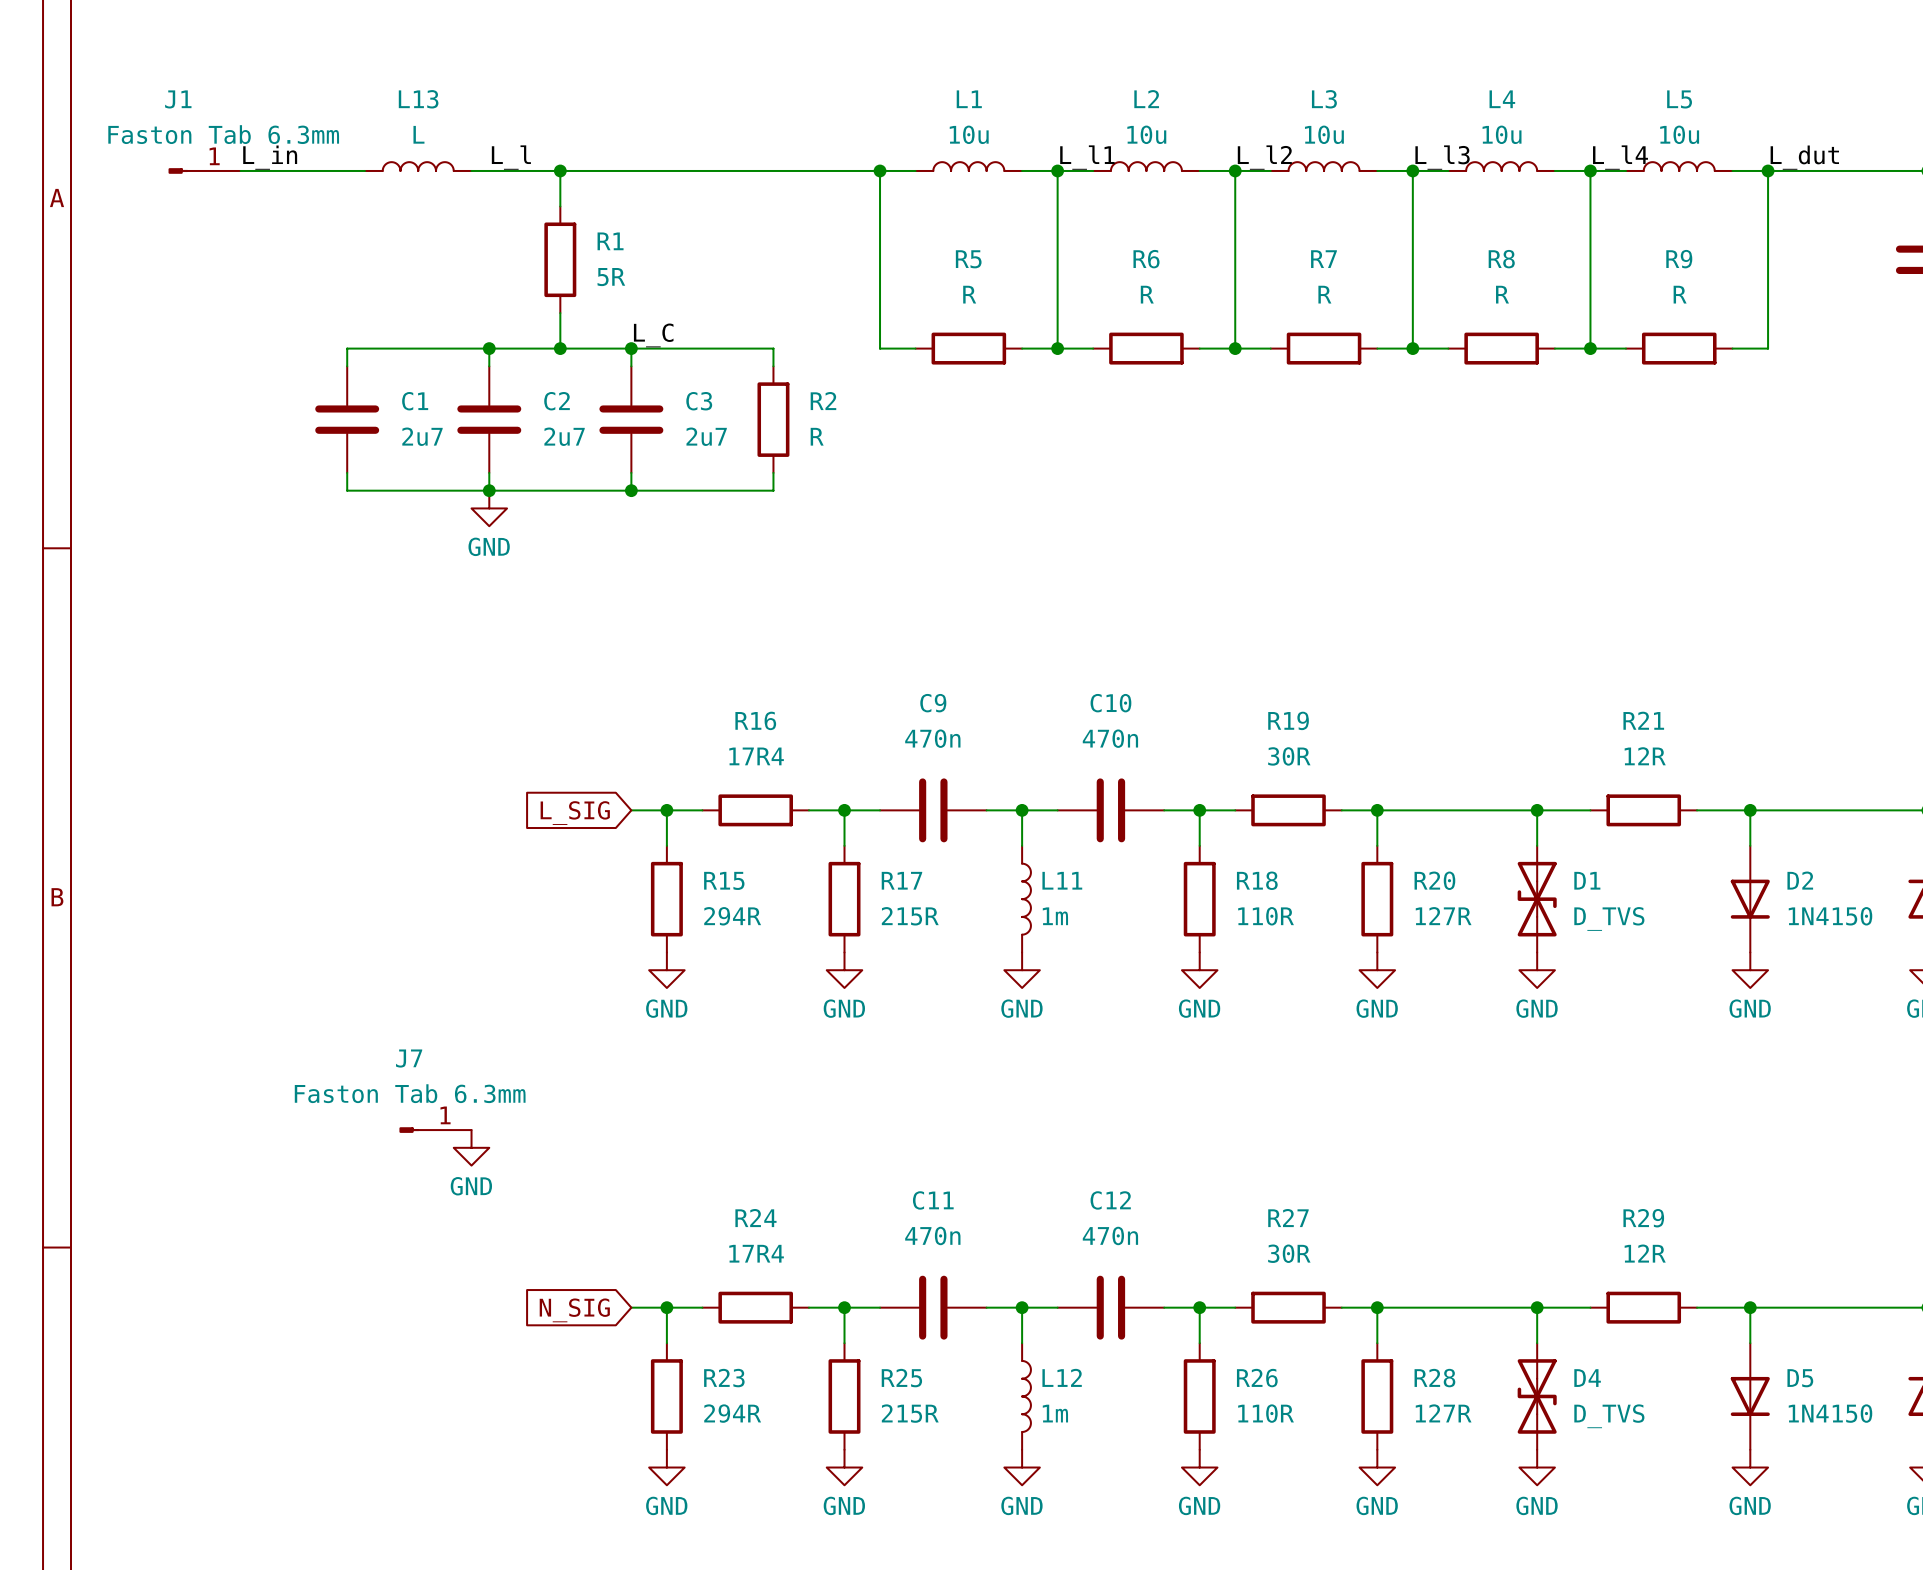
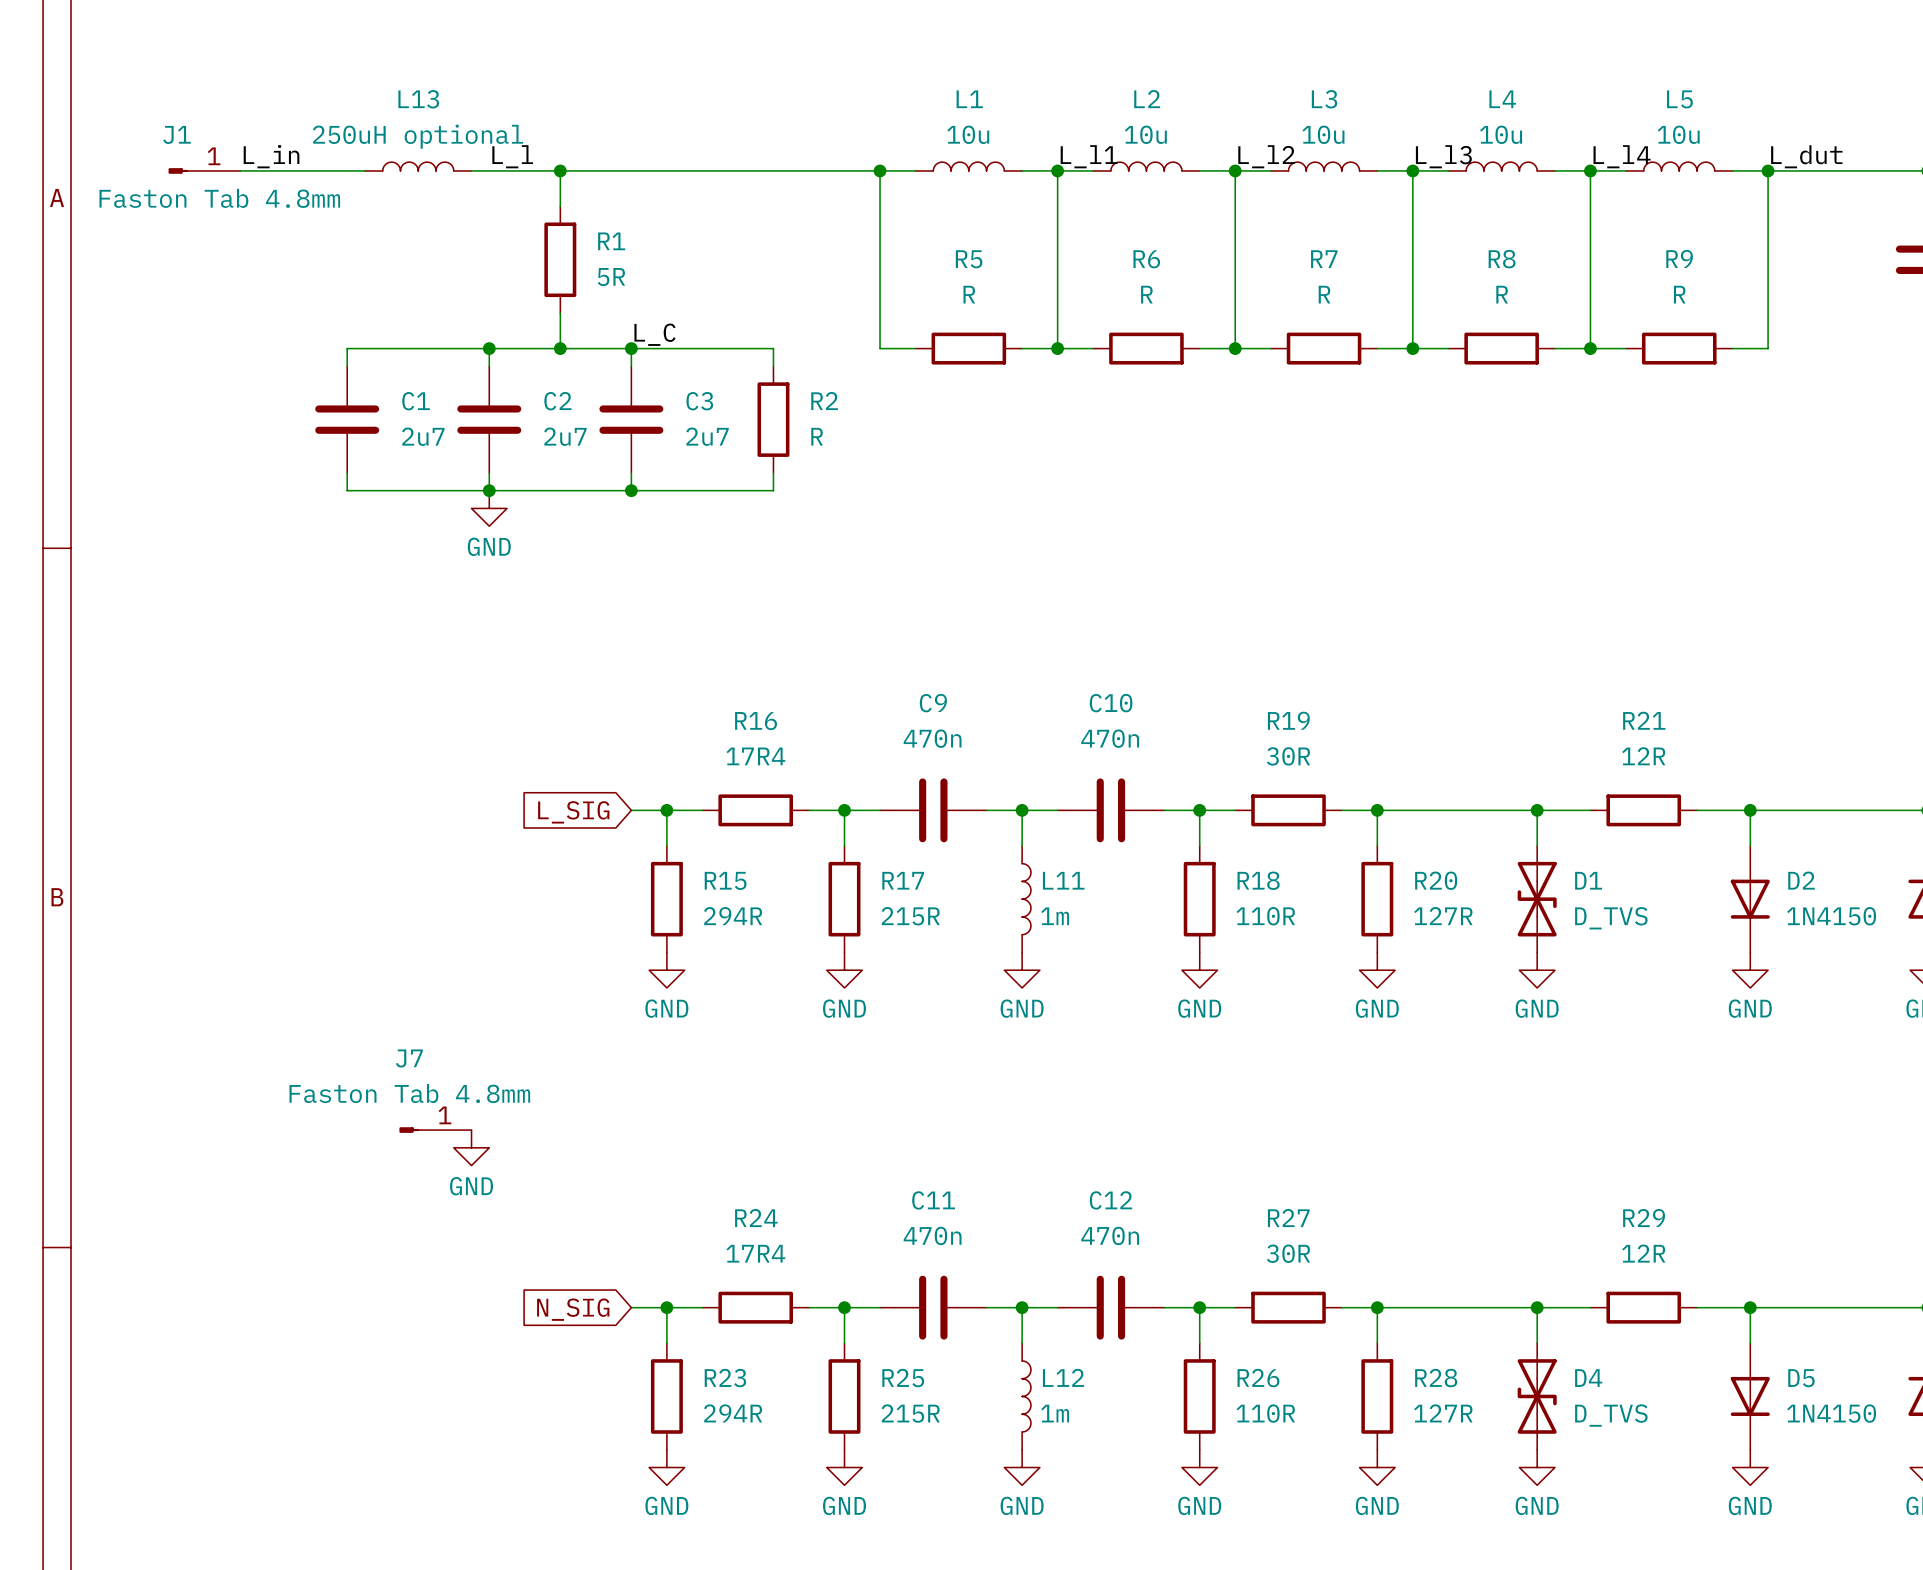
J1 name position: J1 (178, 99) -> J1 (177, 134)
J1 value: Faston Tab 6.3mm (223, 134) -> Faston Tab 4.8mm (219, 198)
L13 value: L (418, 134) -> 250uH optional (418, 136)
J7 value: Faston Tab 6.3mm (410, 1093) -> Faston Tab 4.8mm (409, 1093)

